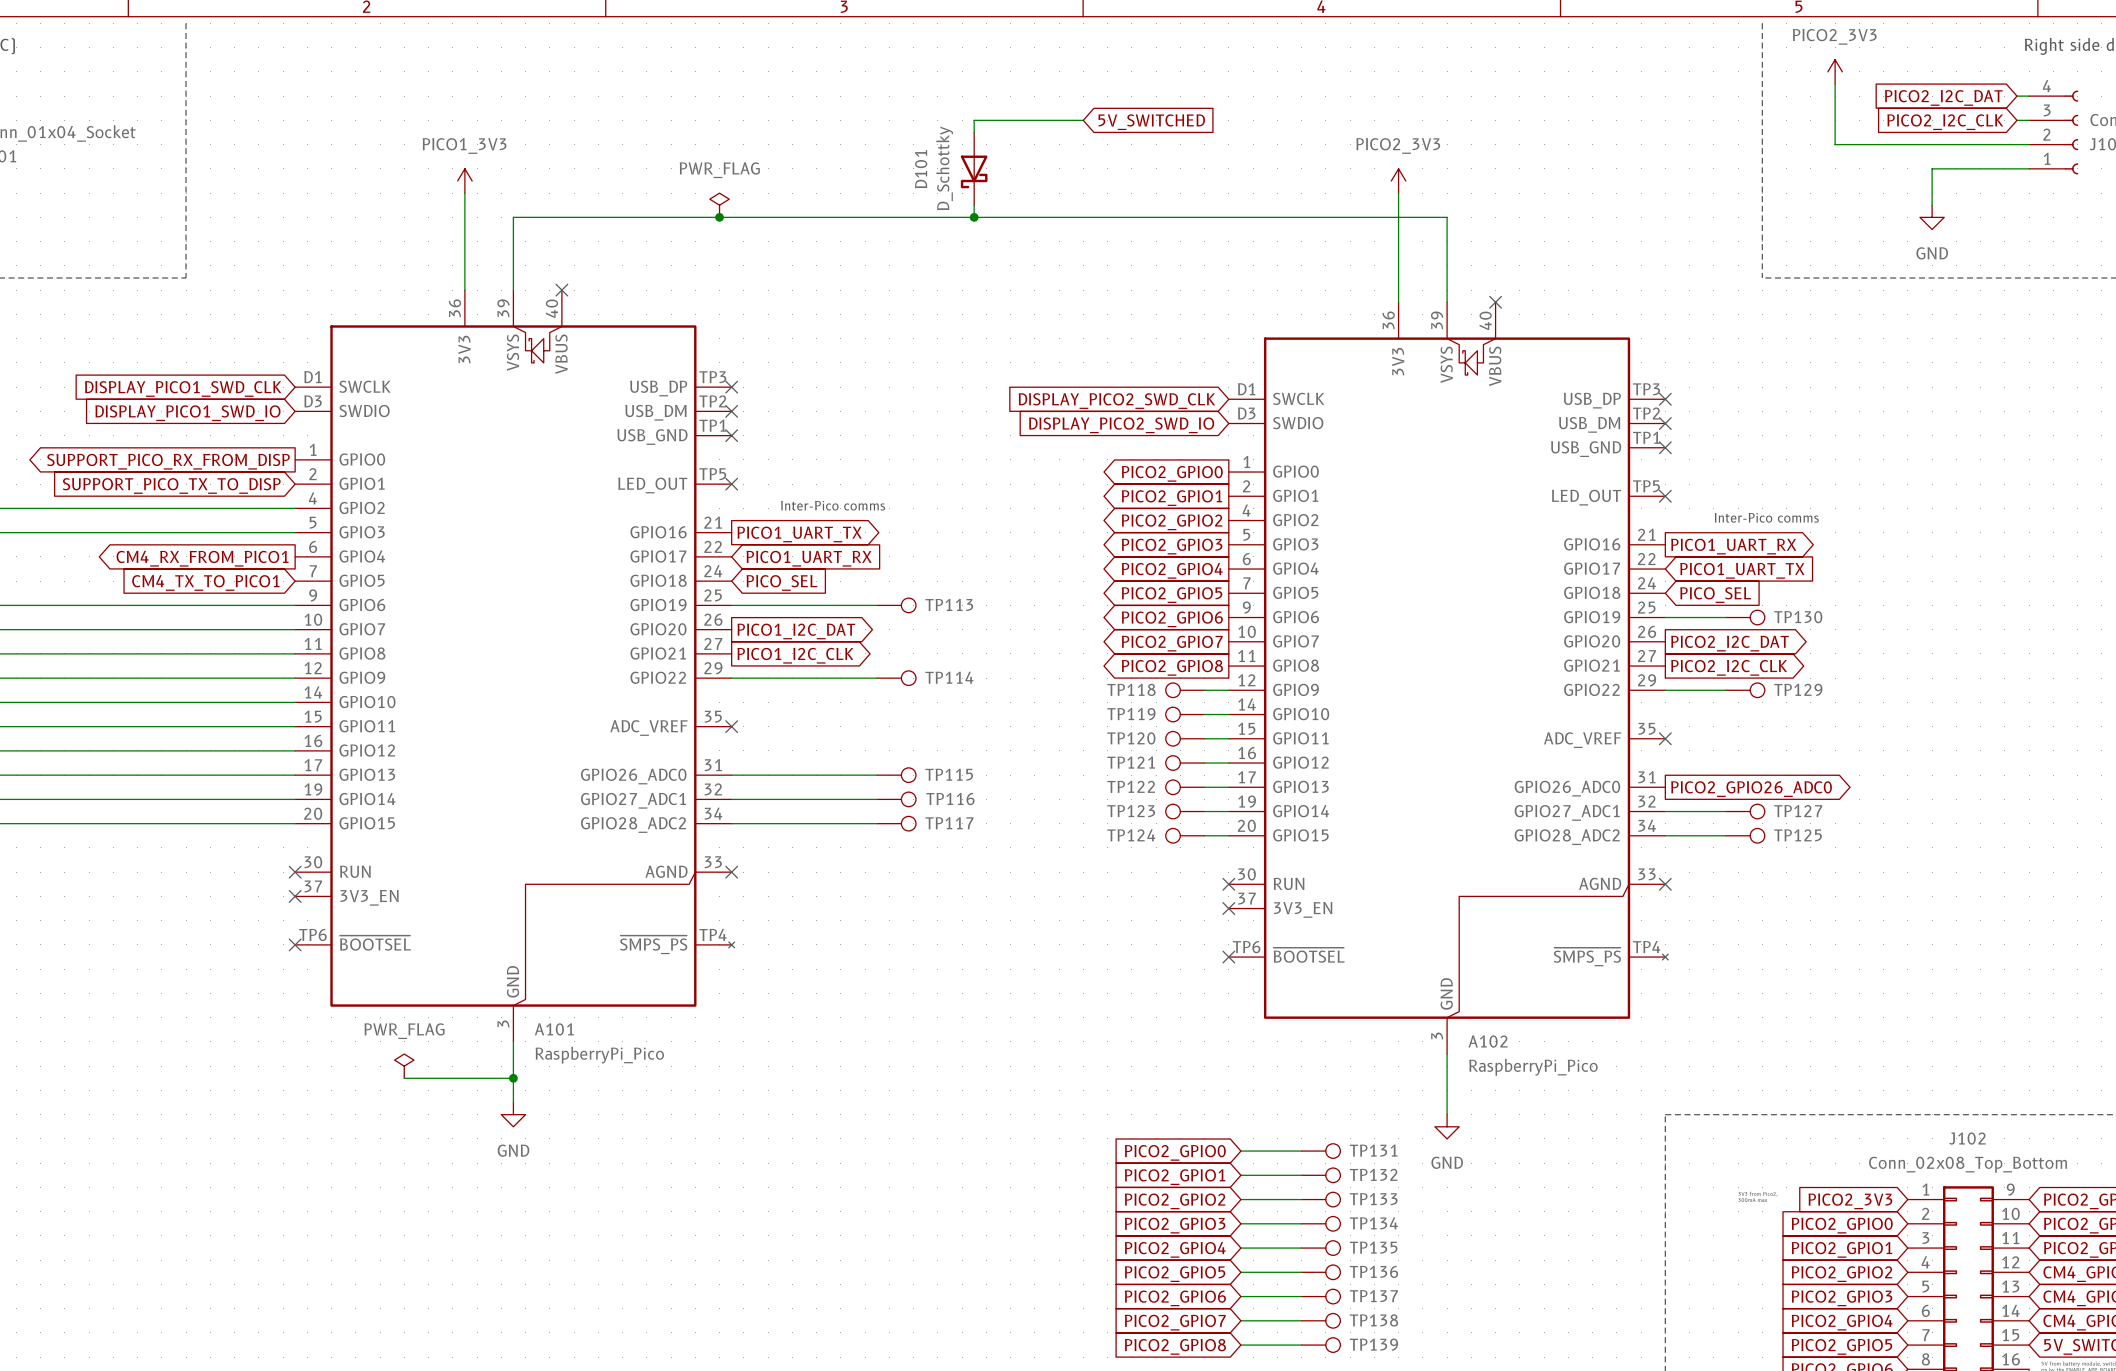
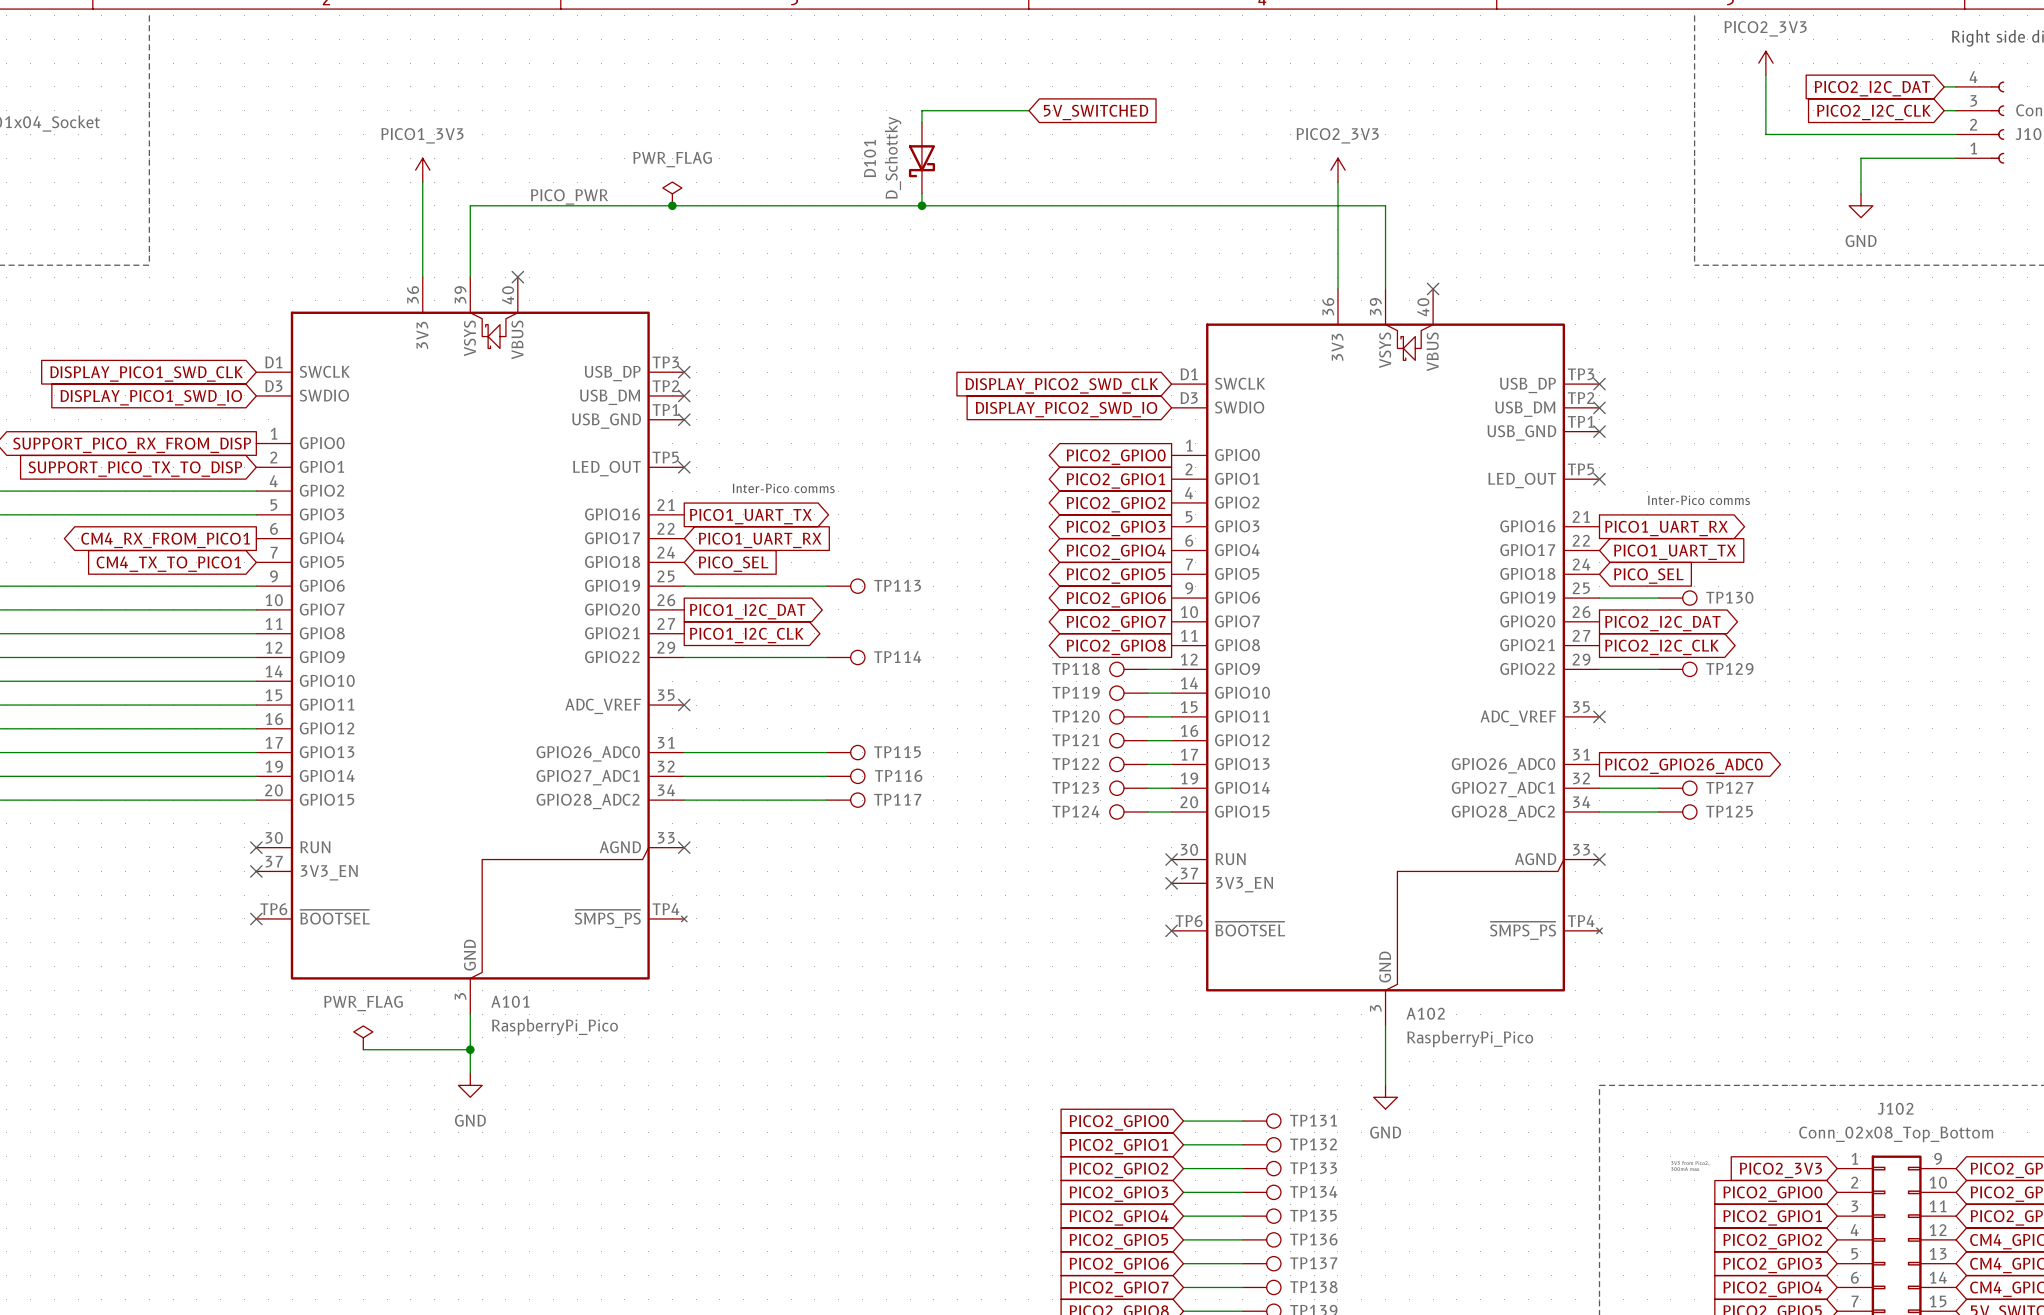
label: none -> PICO_PWR (569, 196)

